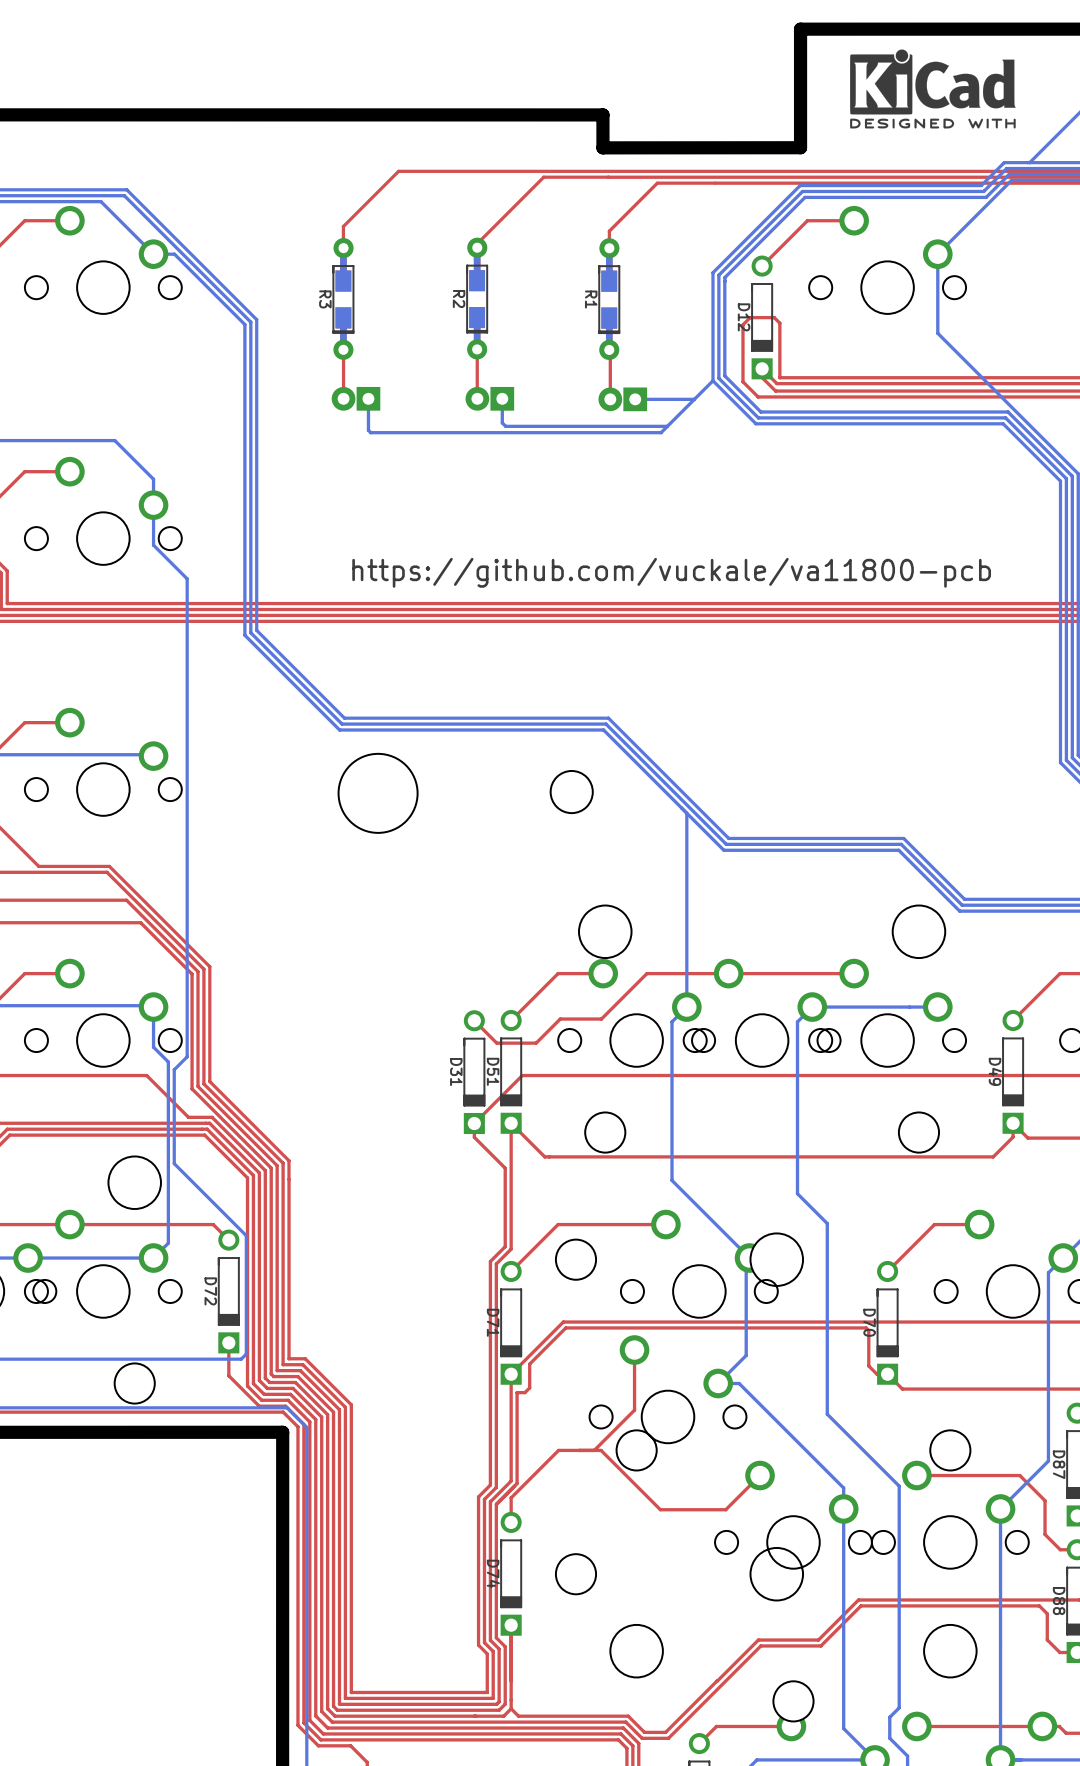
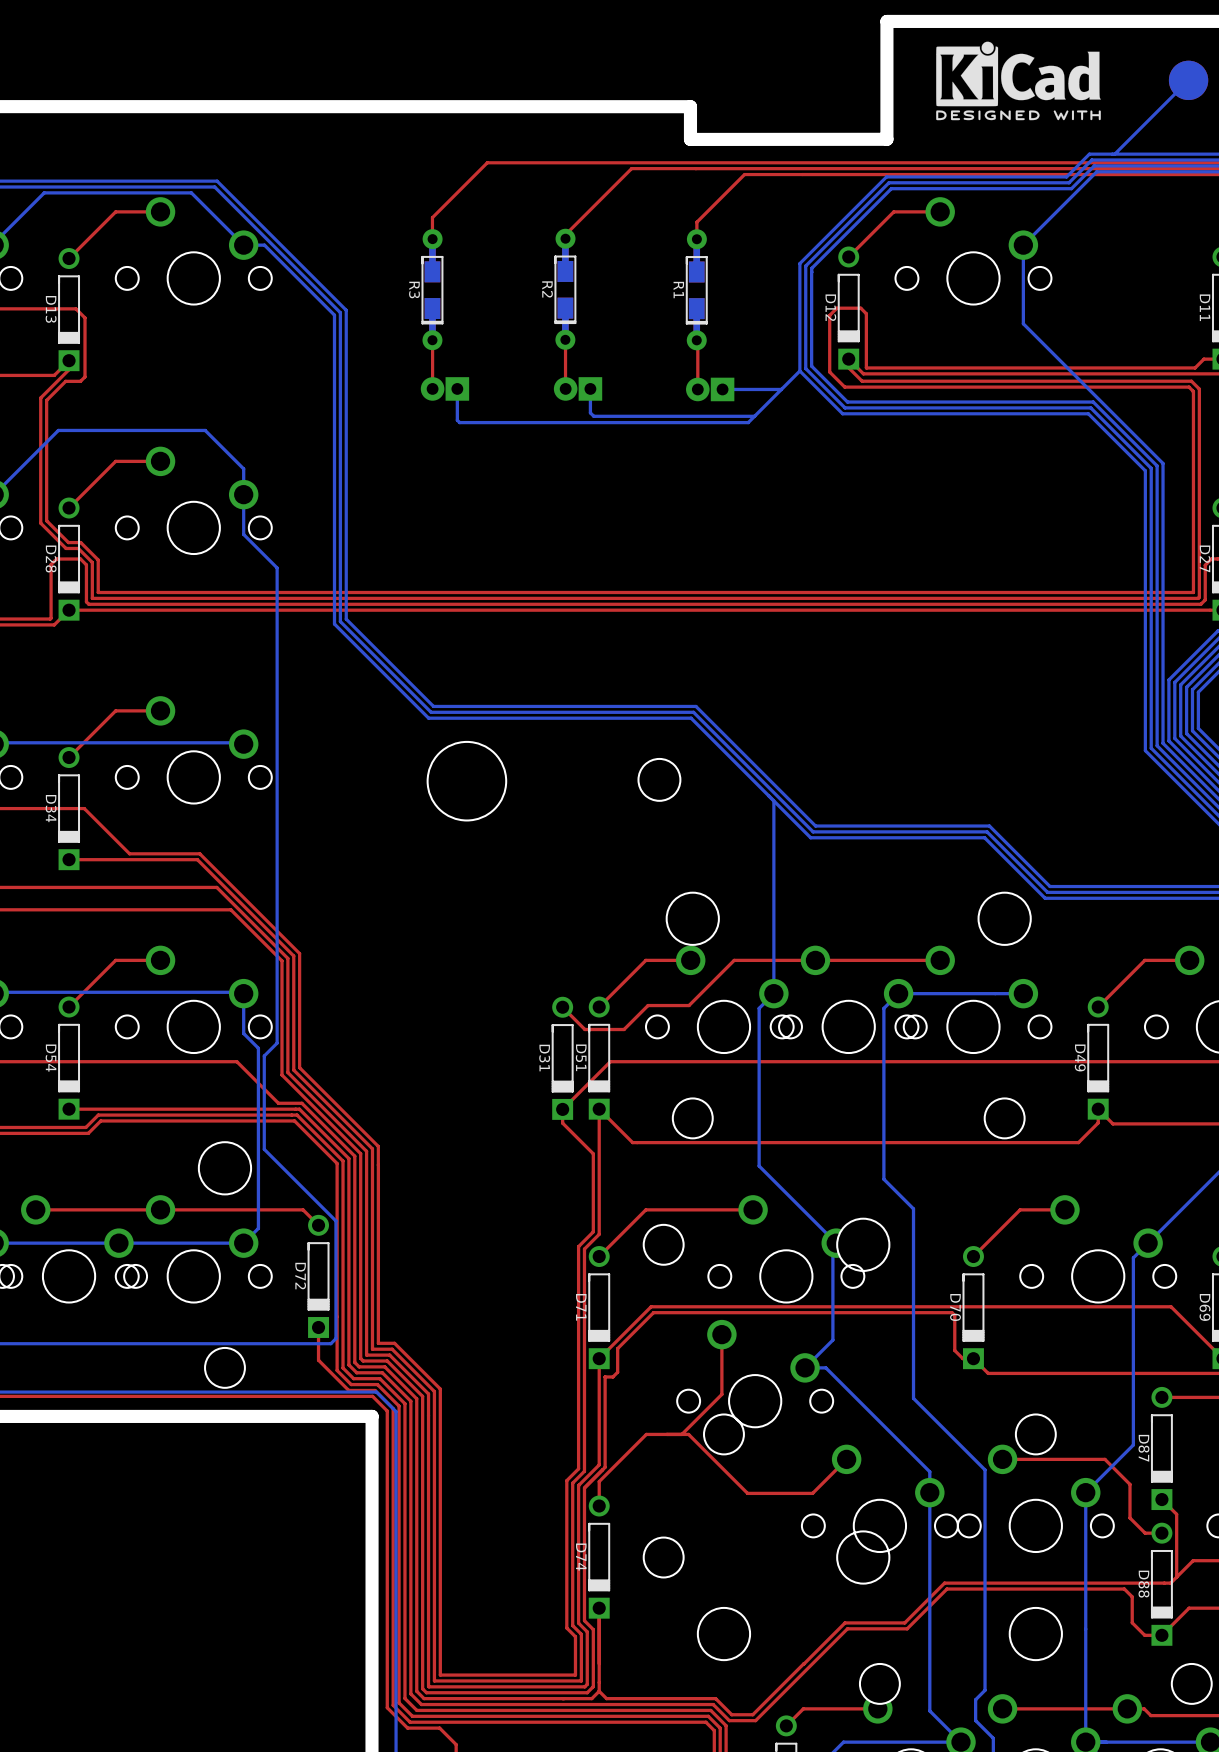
text: https://github.com/vuckale/va11800-pcb (671, 572) -> none

